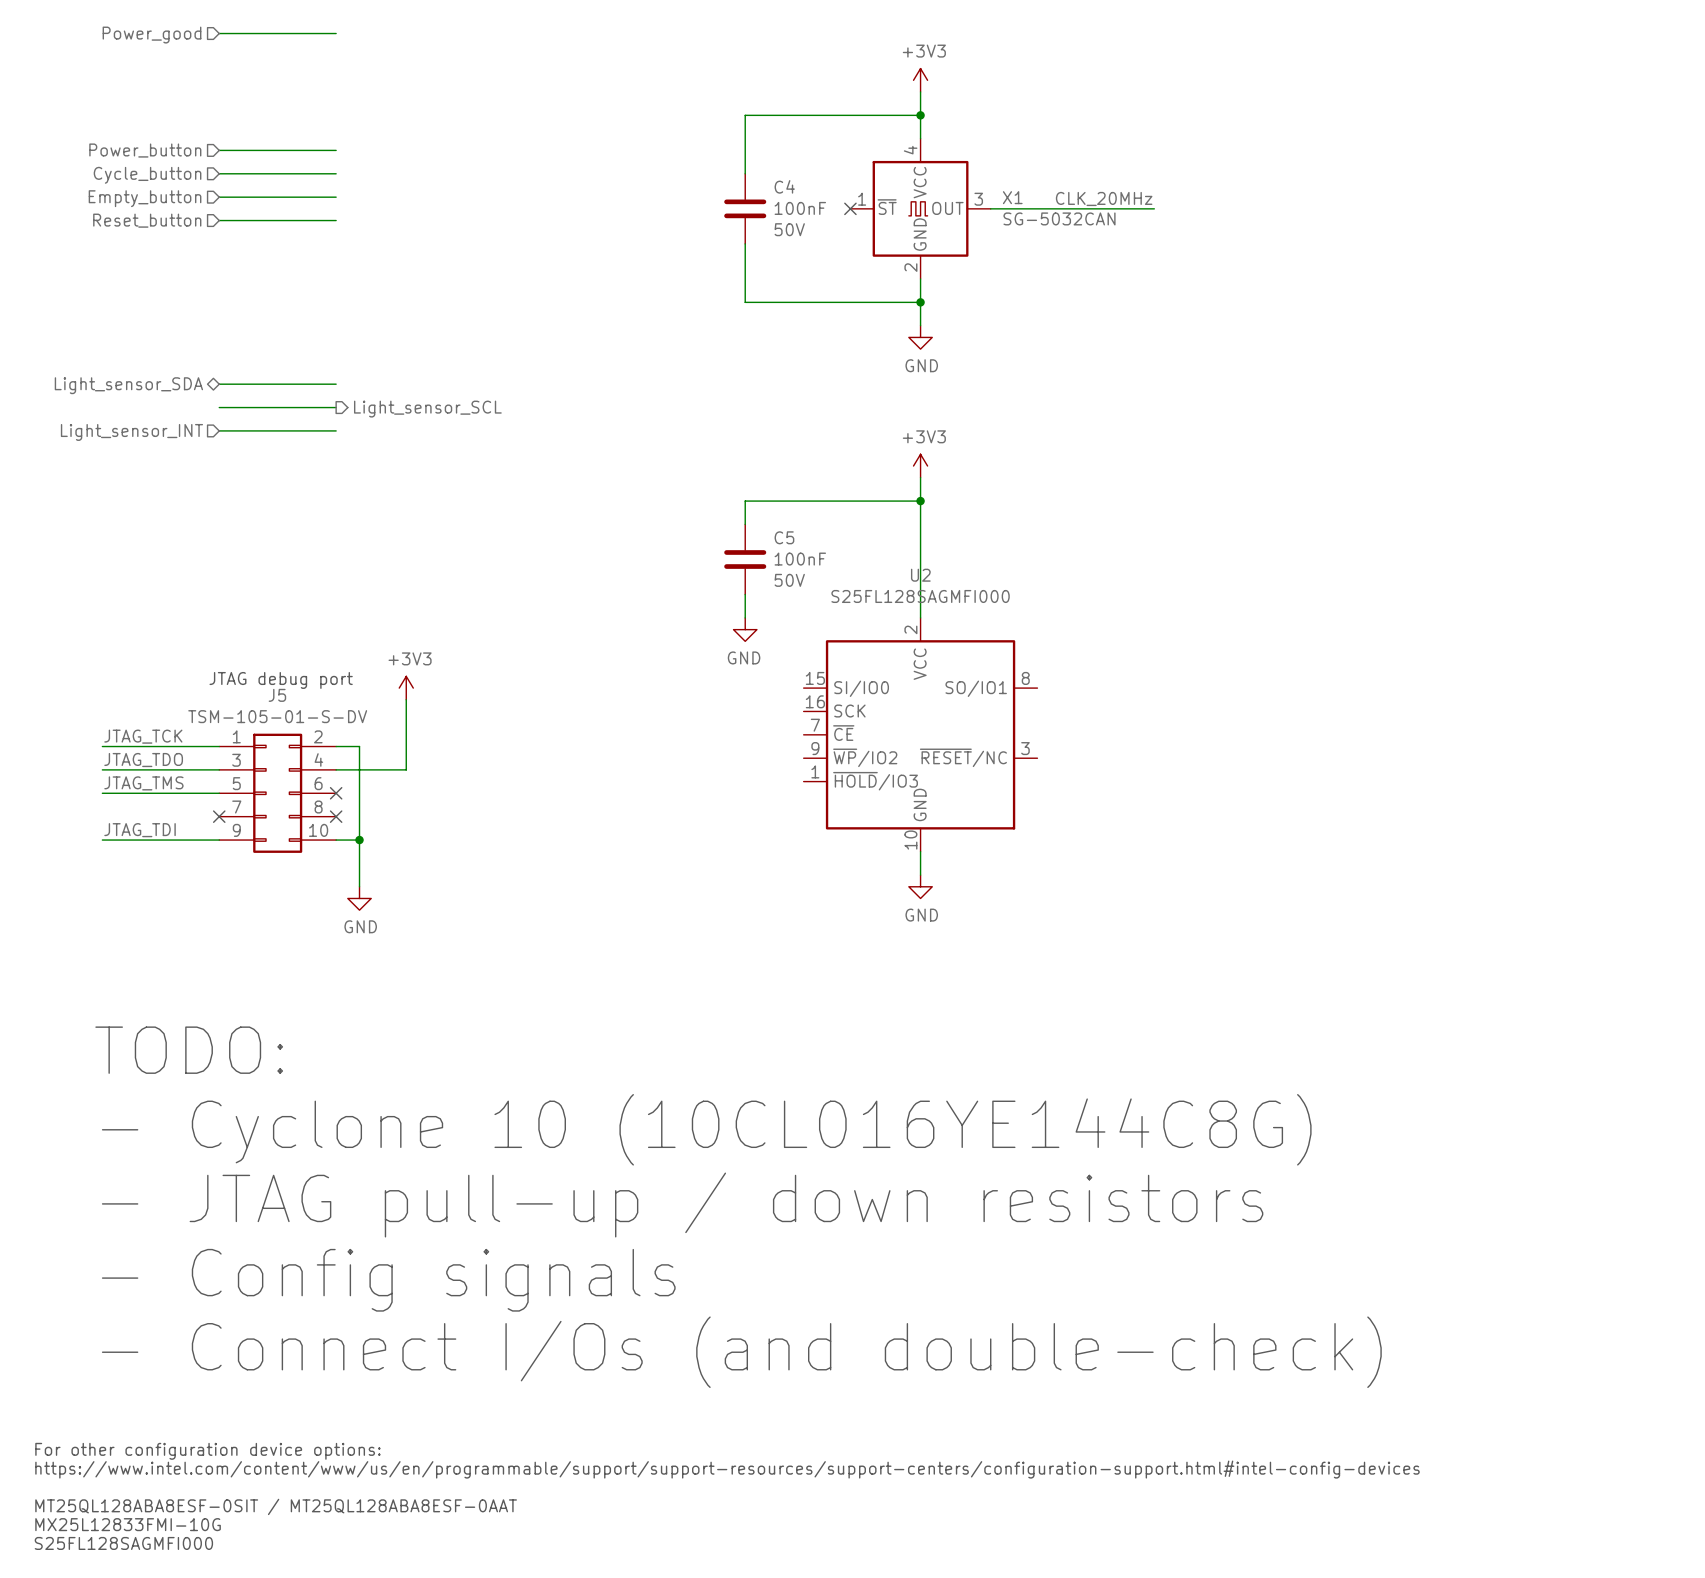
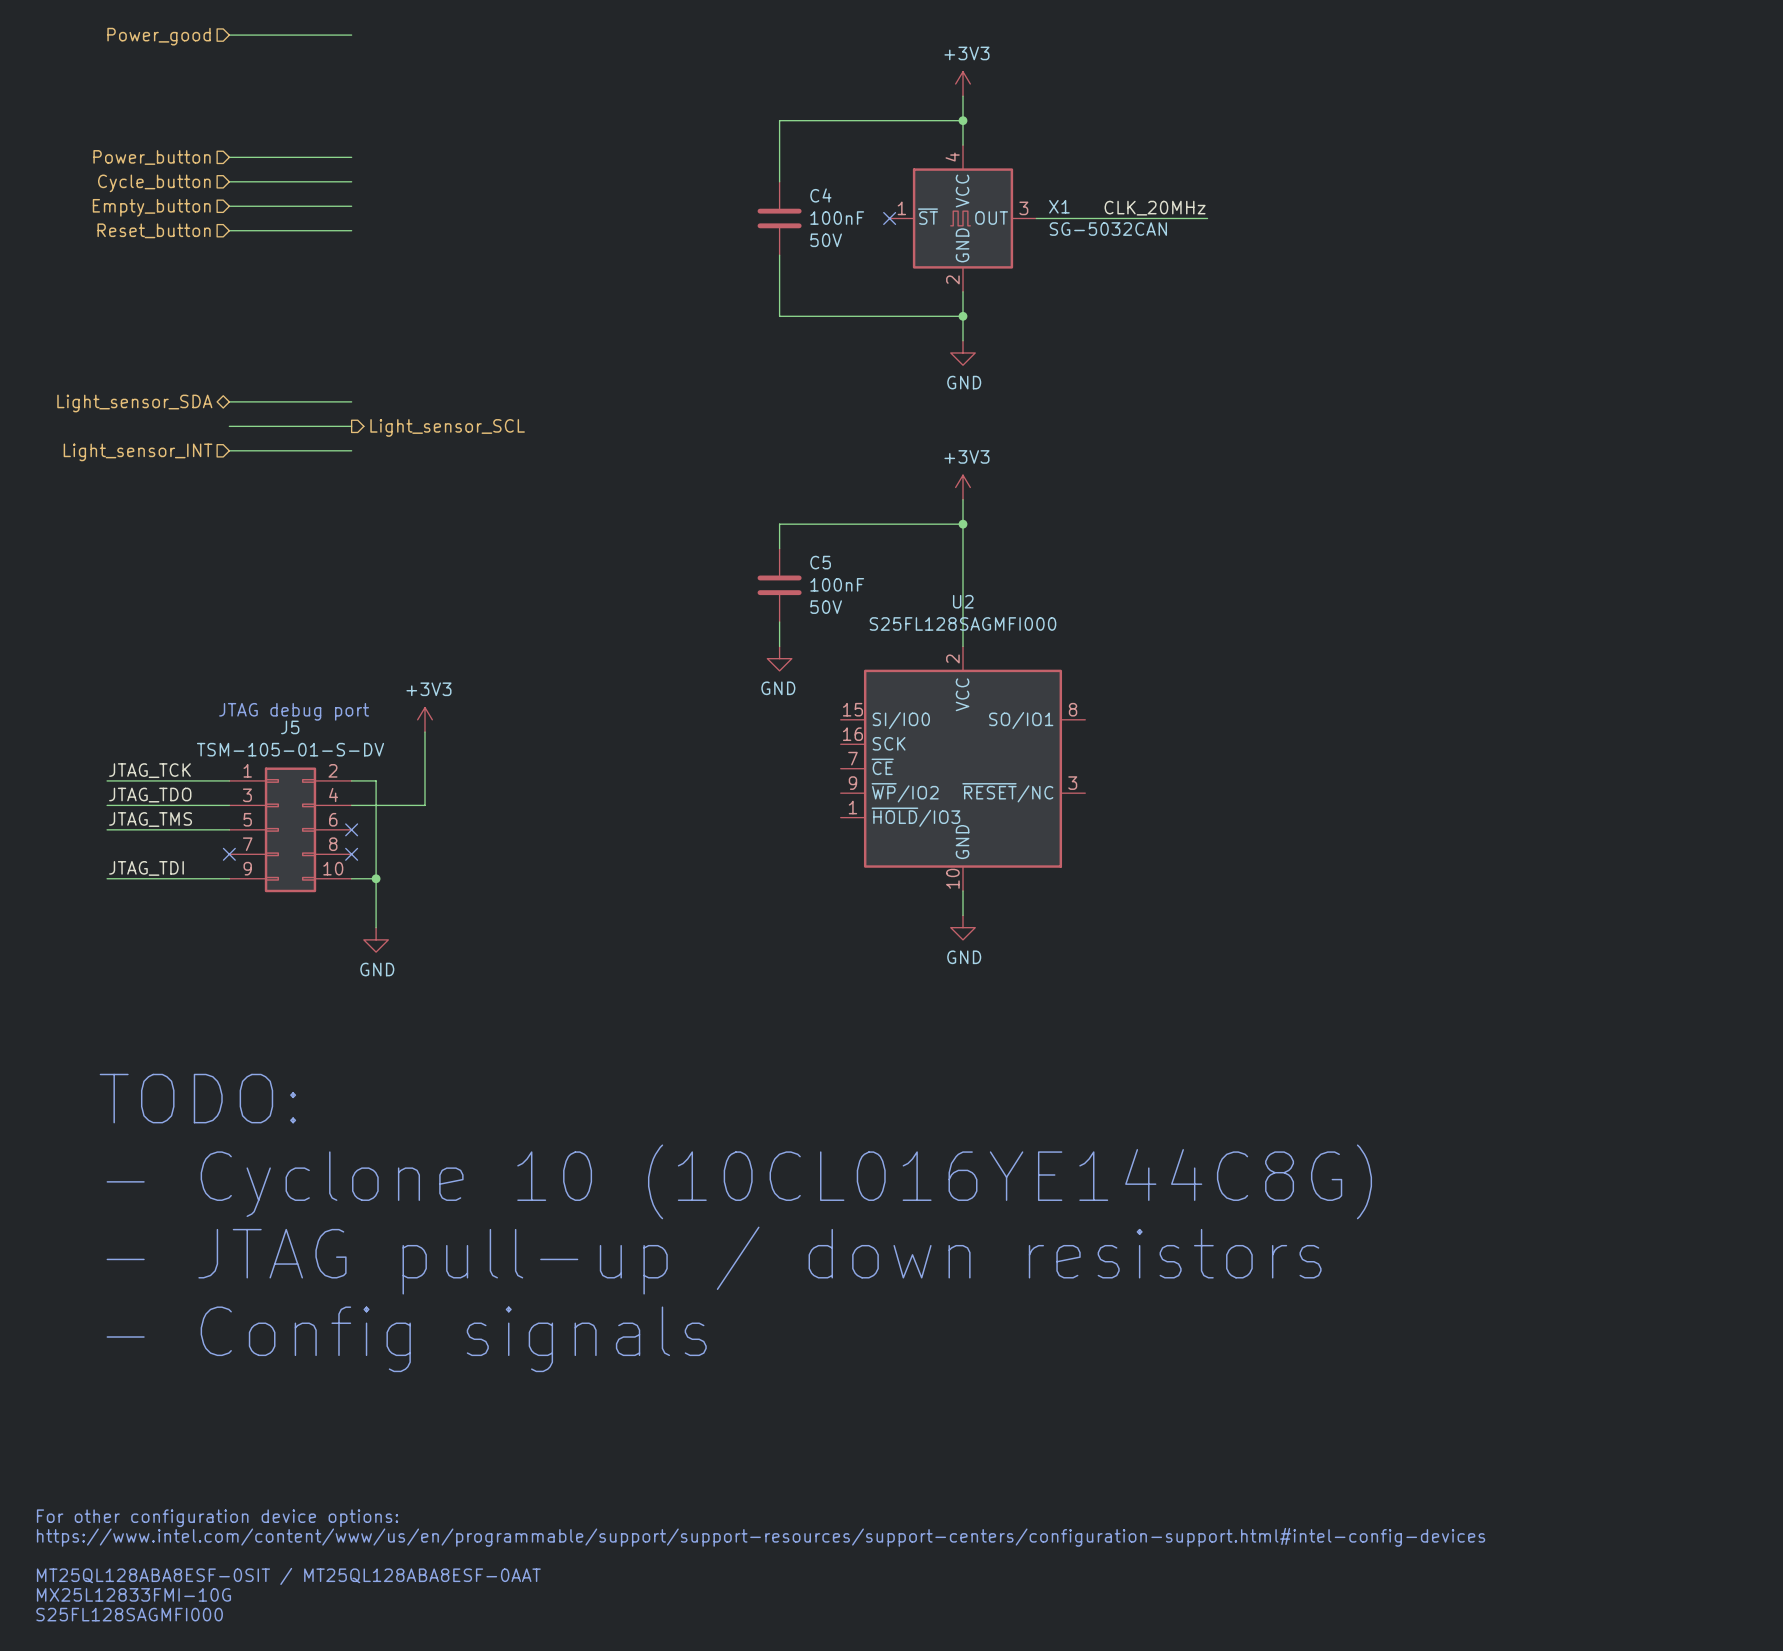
text: - Connect I/Os (and double-check) (741, 1352) -> none

